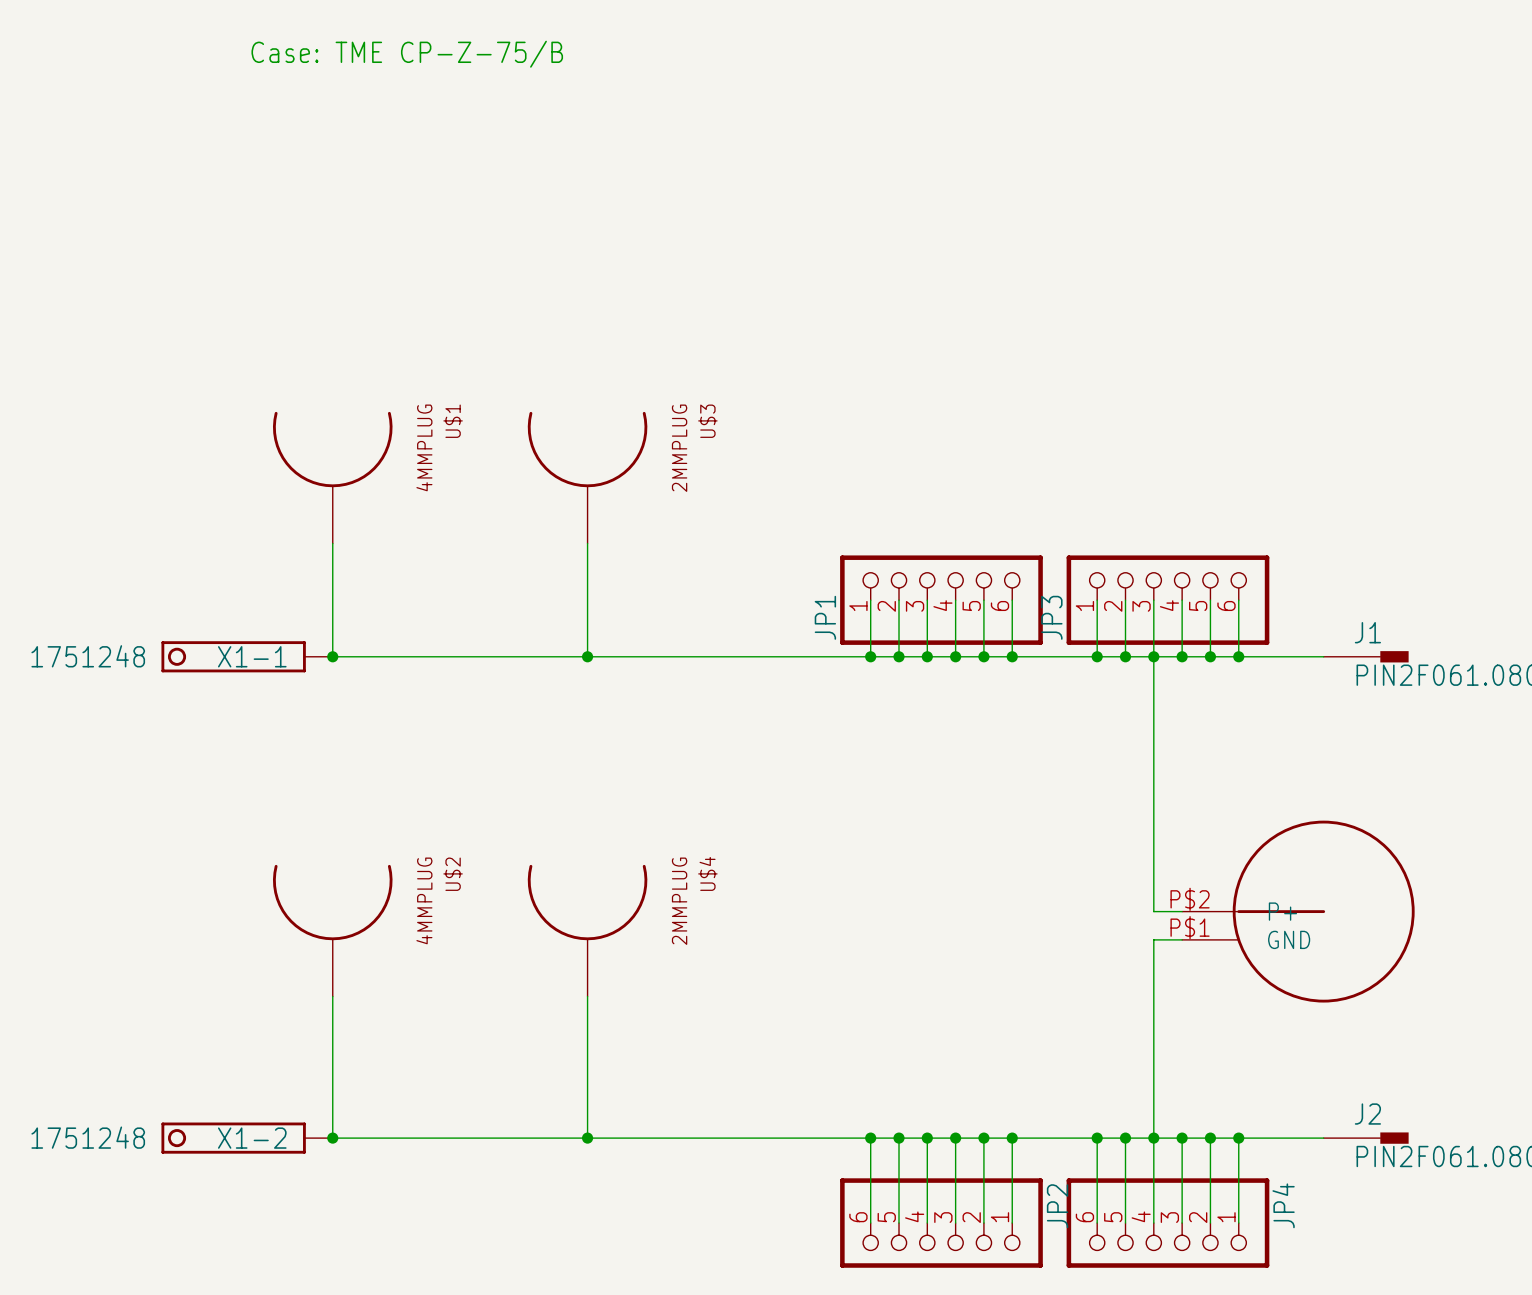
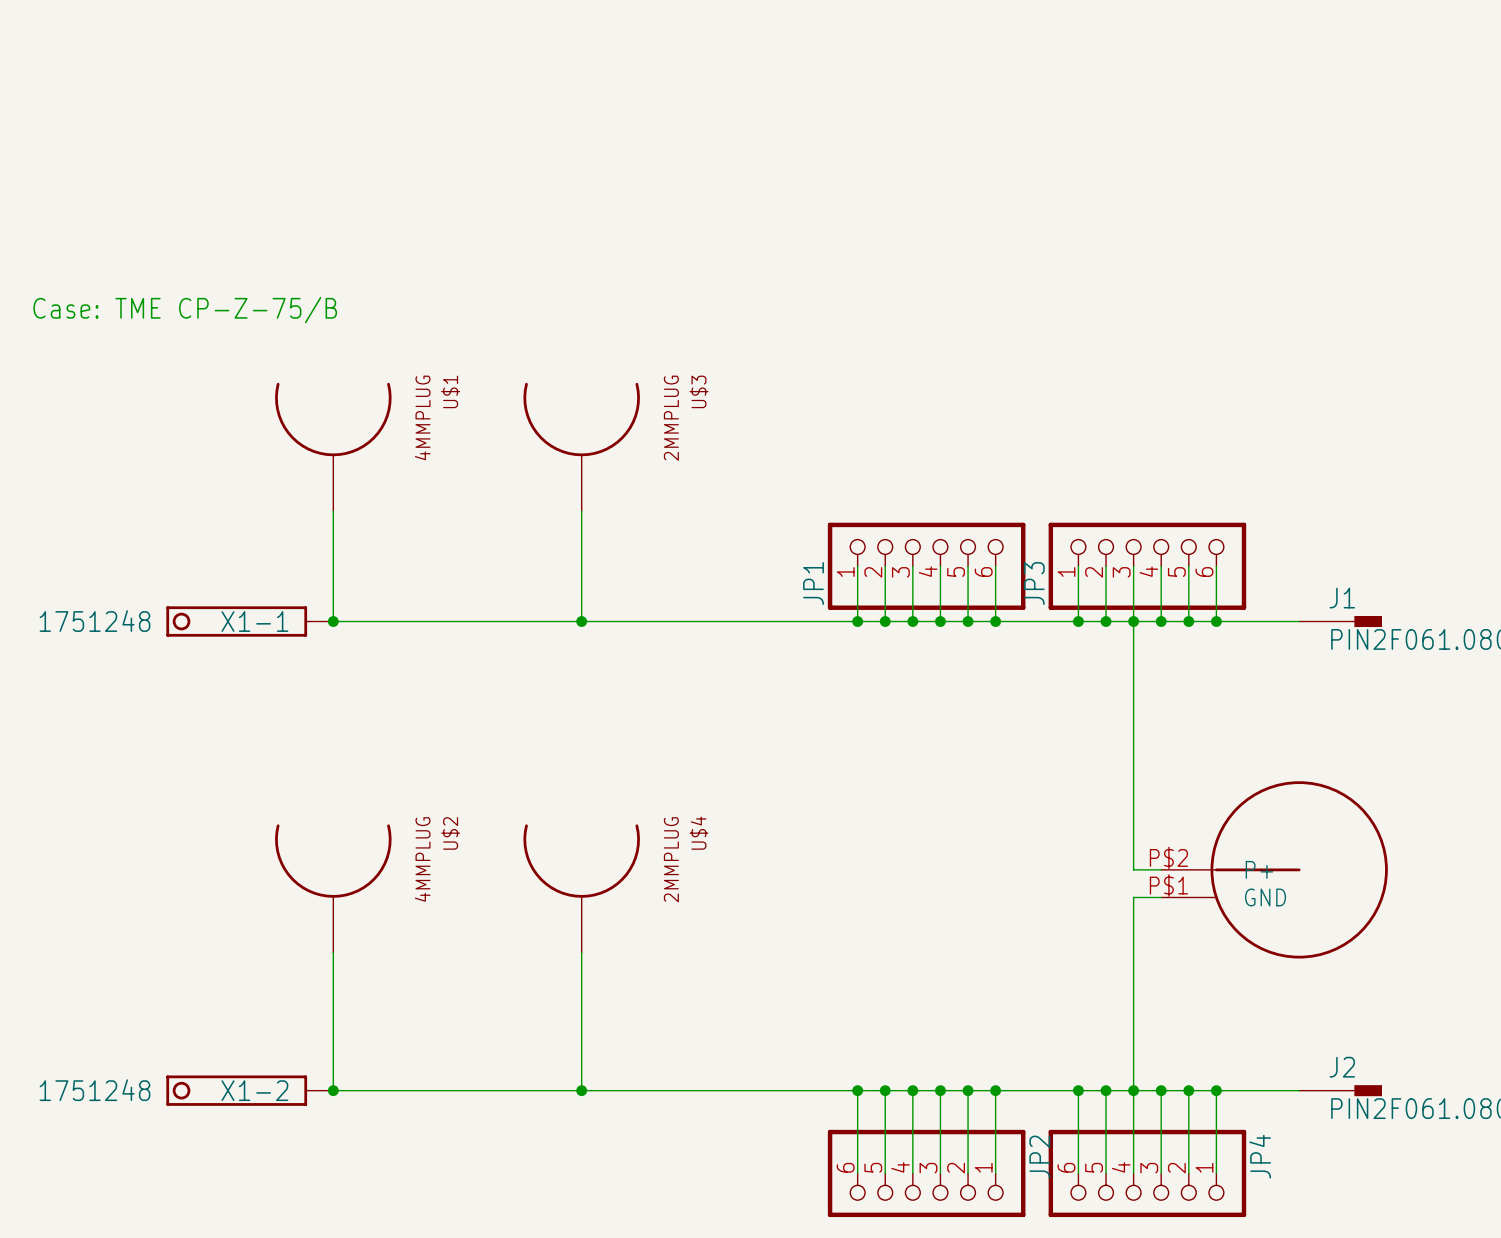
text: Case: TME CP-Z-75/B (407, 54) -> none
text: none -> Case: TME CP-Z-75/B (185, 310)

